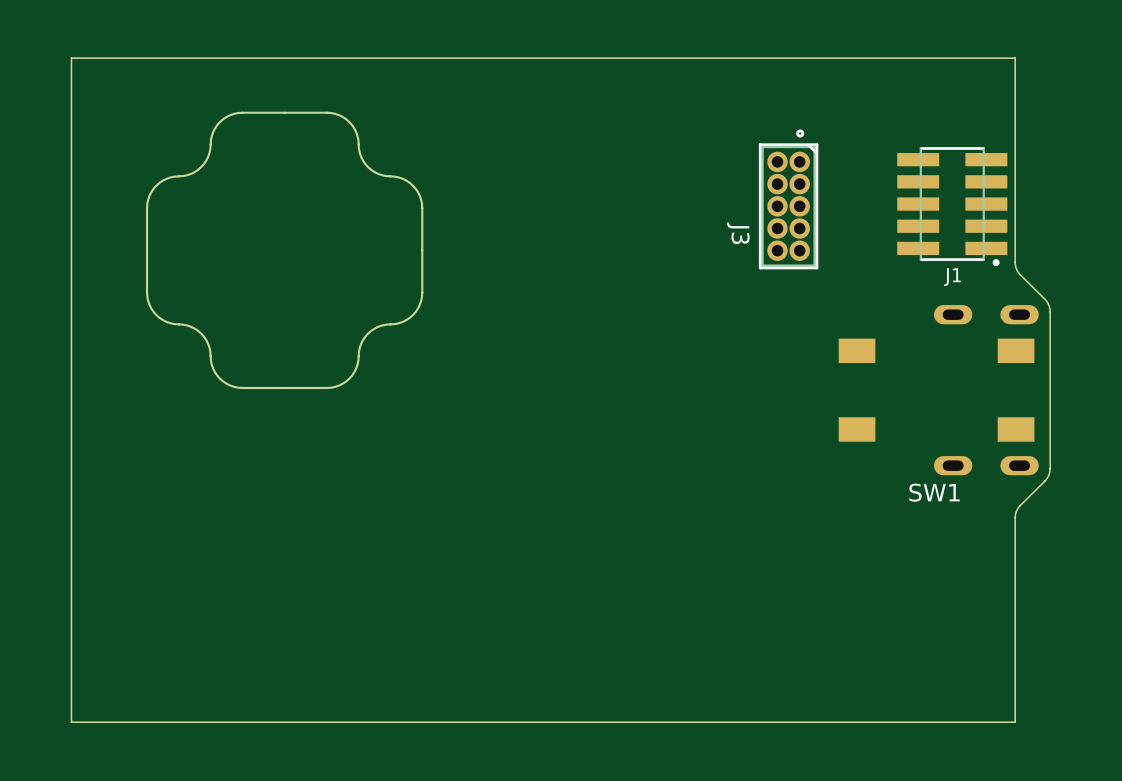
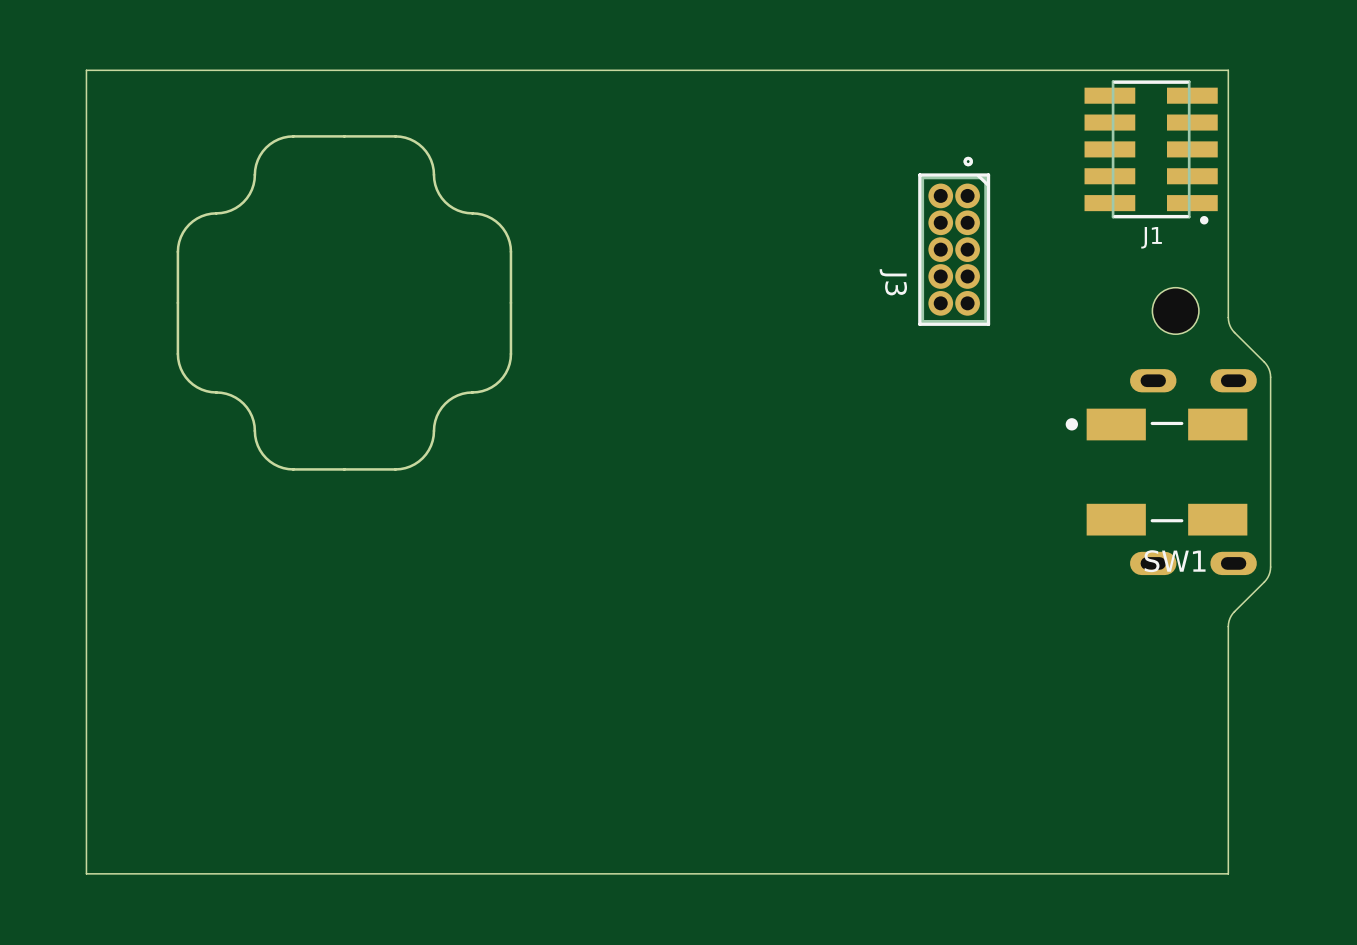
J1 position: (952, 206) -> (1151, 152)
part: none -> (1175, 310)
SW1 footprint: [838, 338, 1035, 442] -> [1065, 408, 1248, 536]

